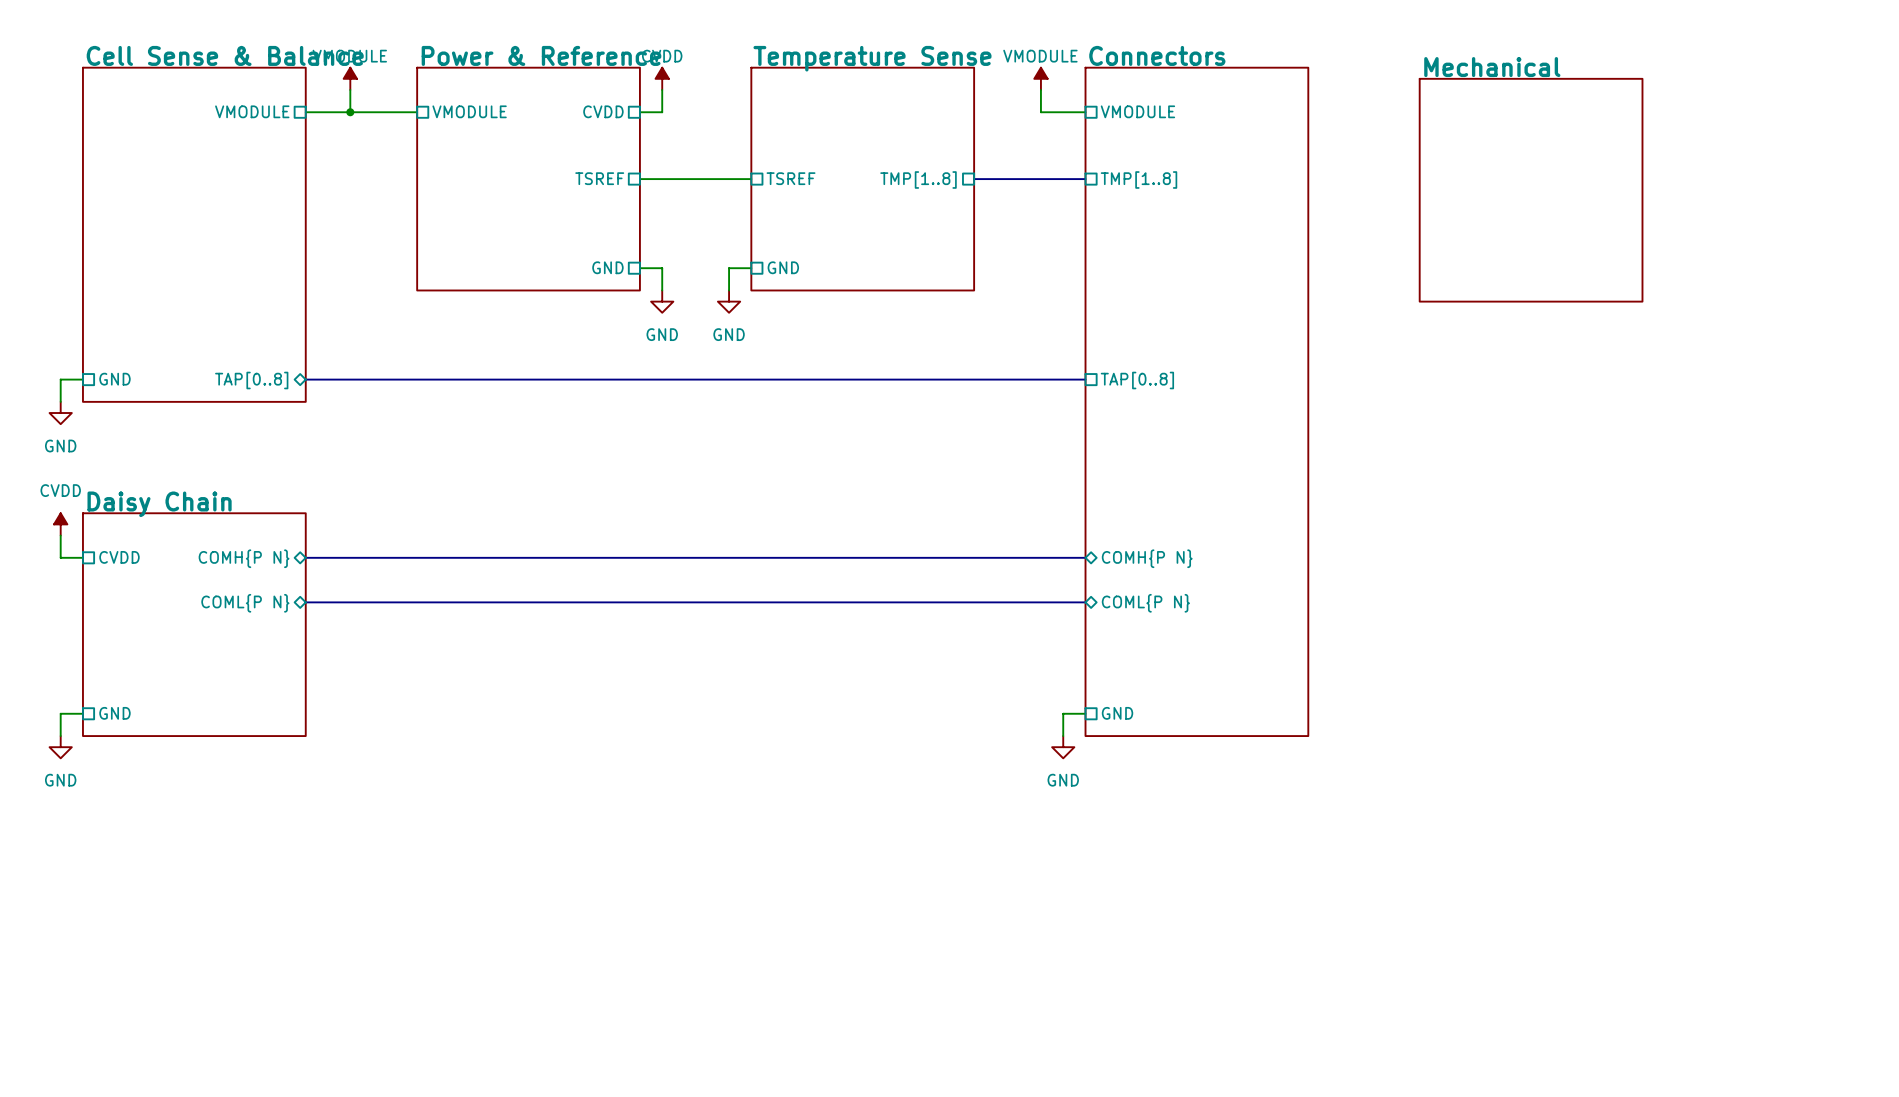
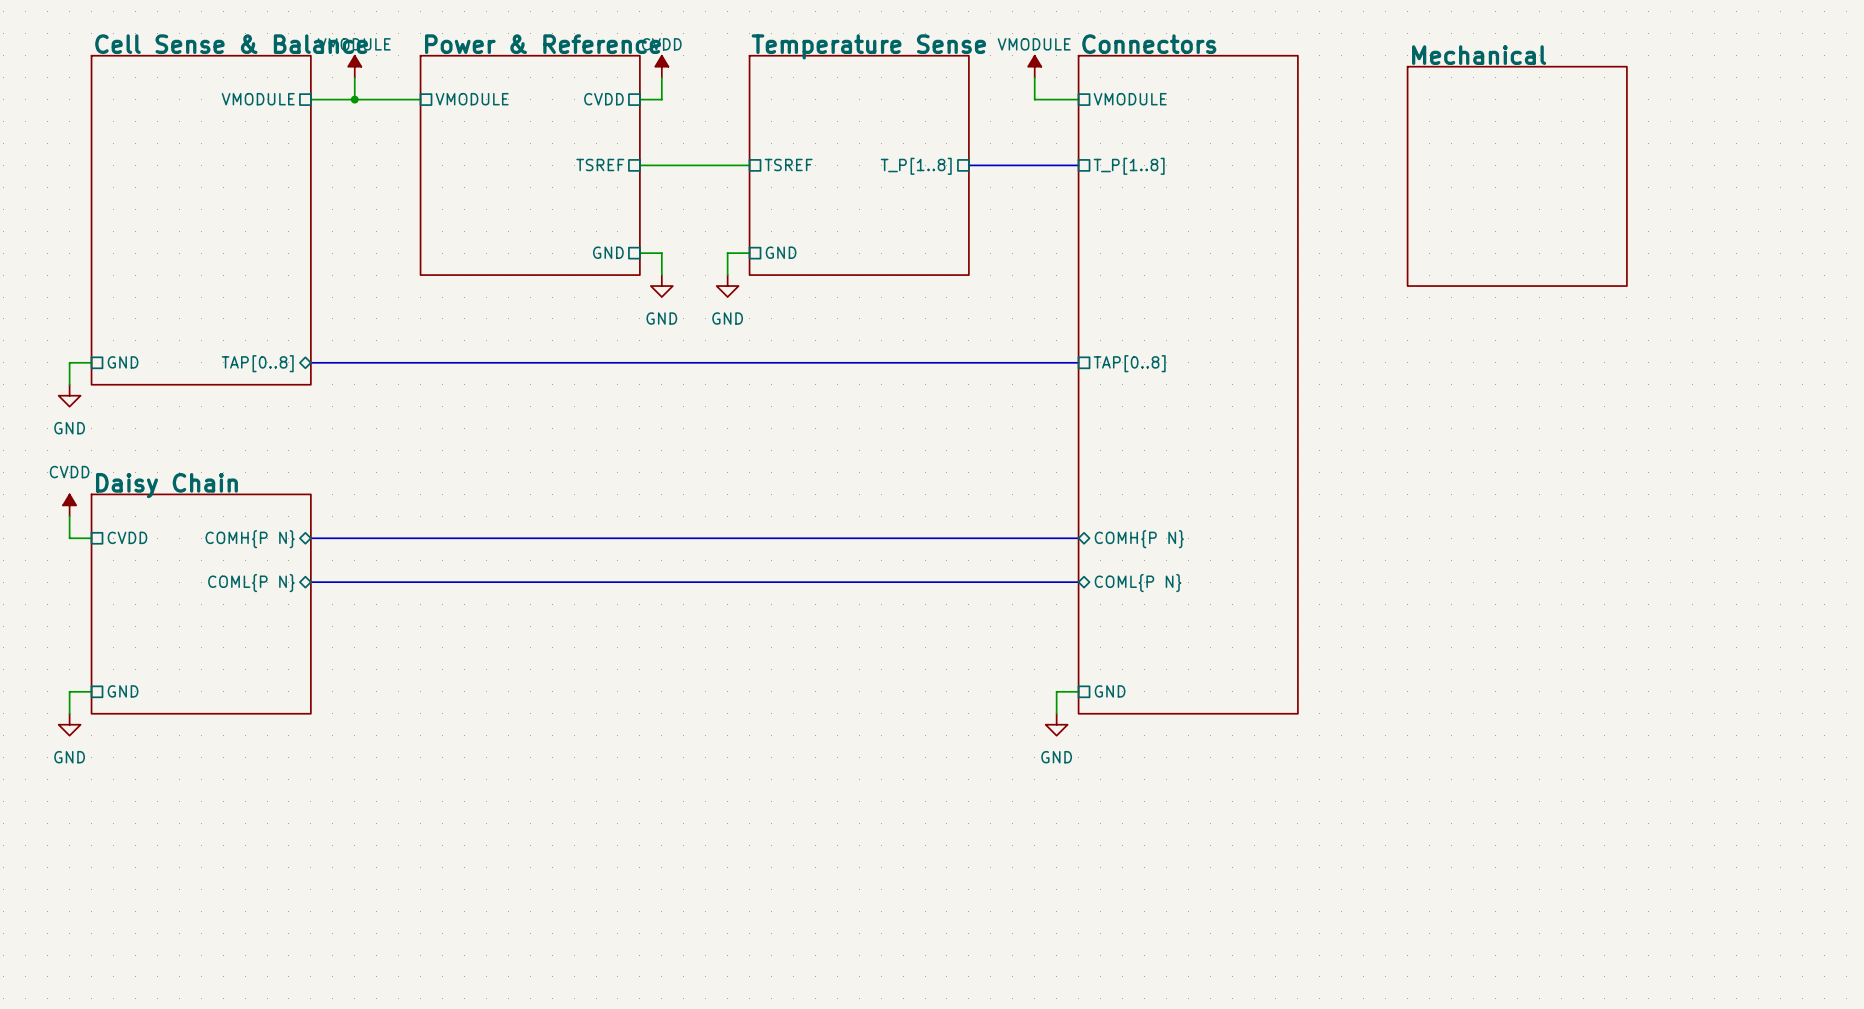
sheet pin: TMP[1..8] (918, 179) -> T_P[1..8] (916, 166)
sheet pin: TMP[1..8] (1139, 179) -> T_P[1..8] (1129, 166)

